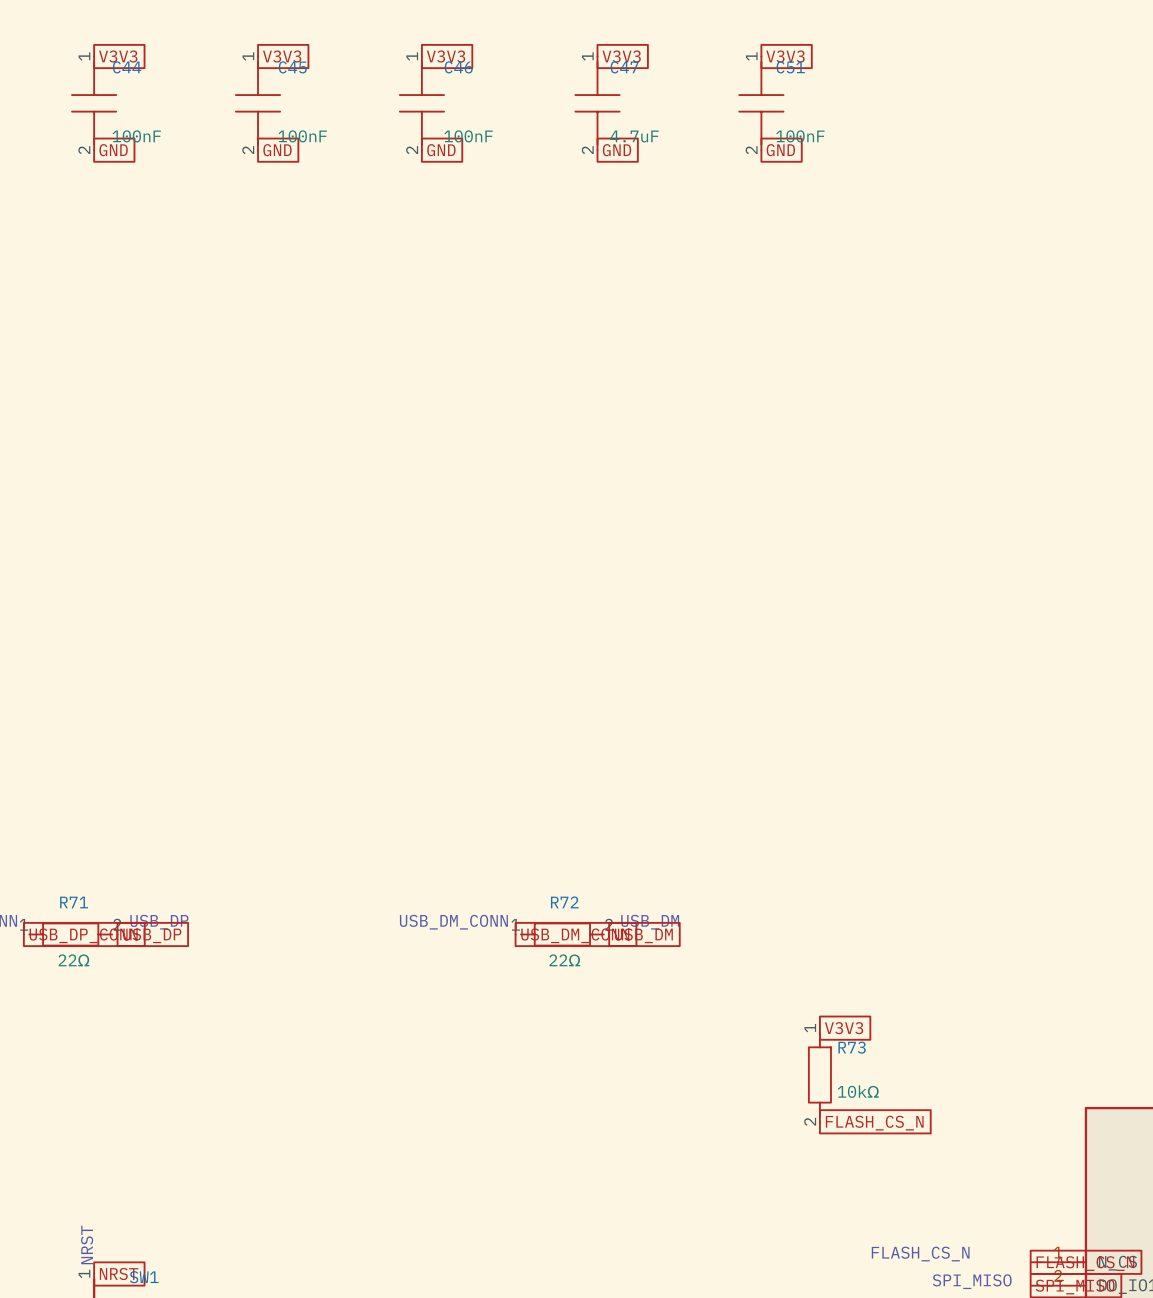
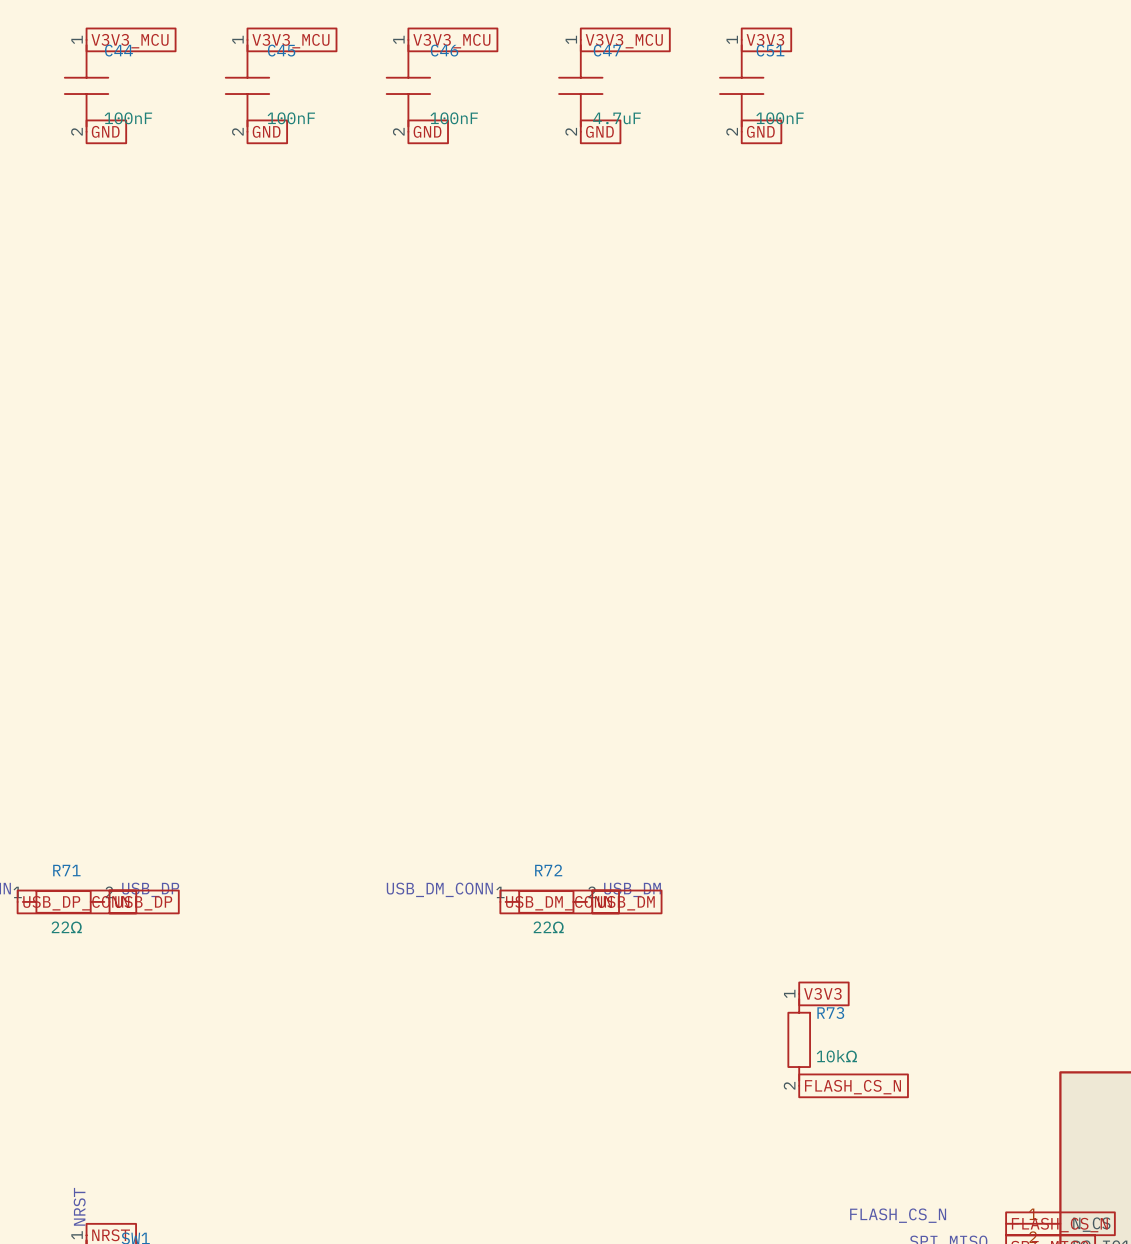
global label: V3V3 (118, 56) -> V3V3_MCU (130, 41)
global label: V3V3 (282, 56) -> V3V3_MCU (290, 41)
global label: V3V3 (446, 56) -> V3V3_MCU (451, 41)
global label: V3V3 (621, 56) -> V3V3_MCU (624, 41)

